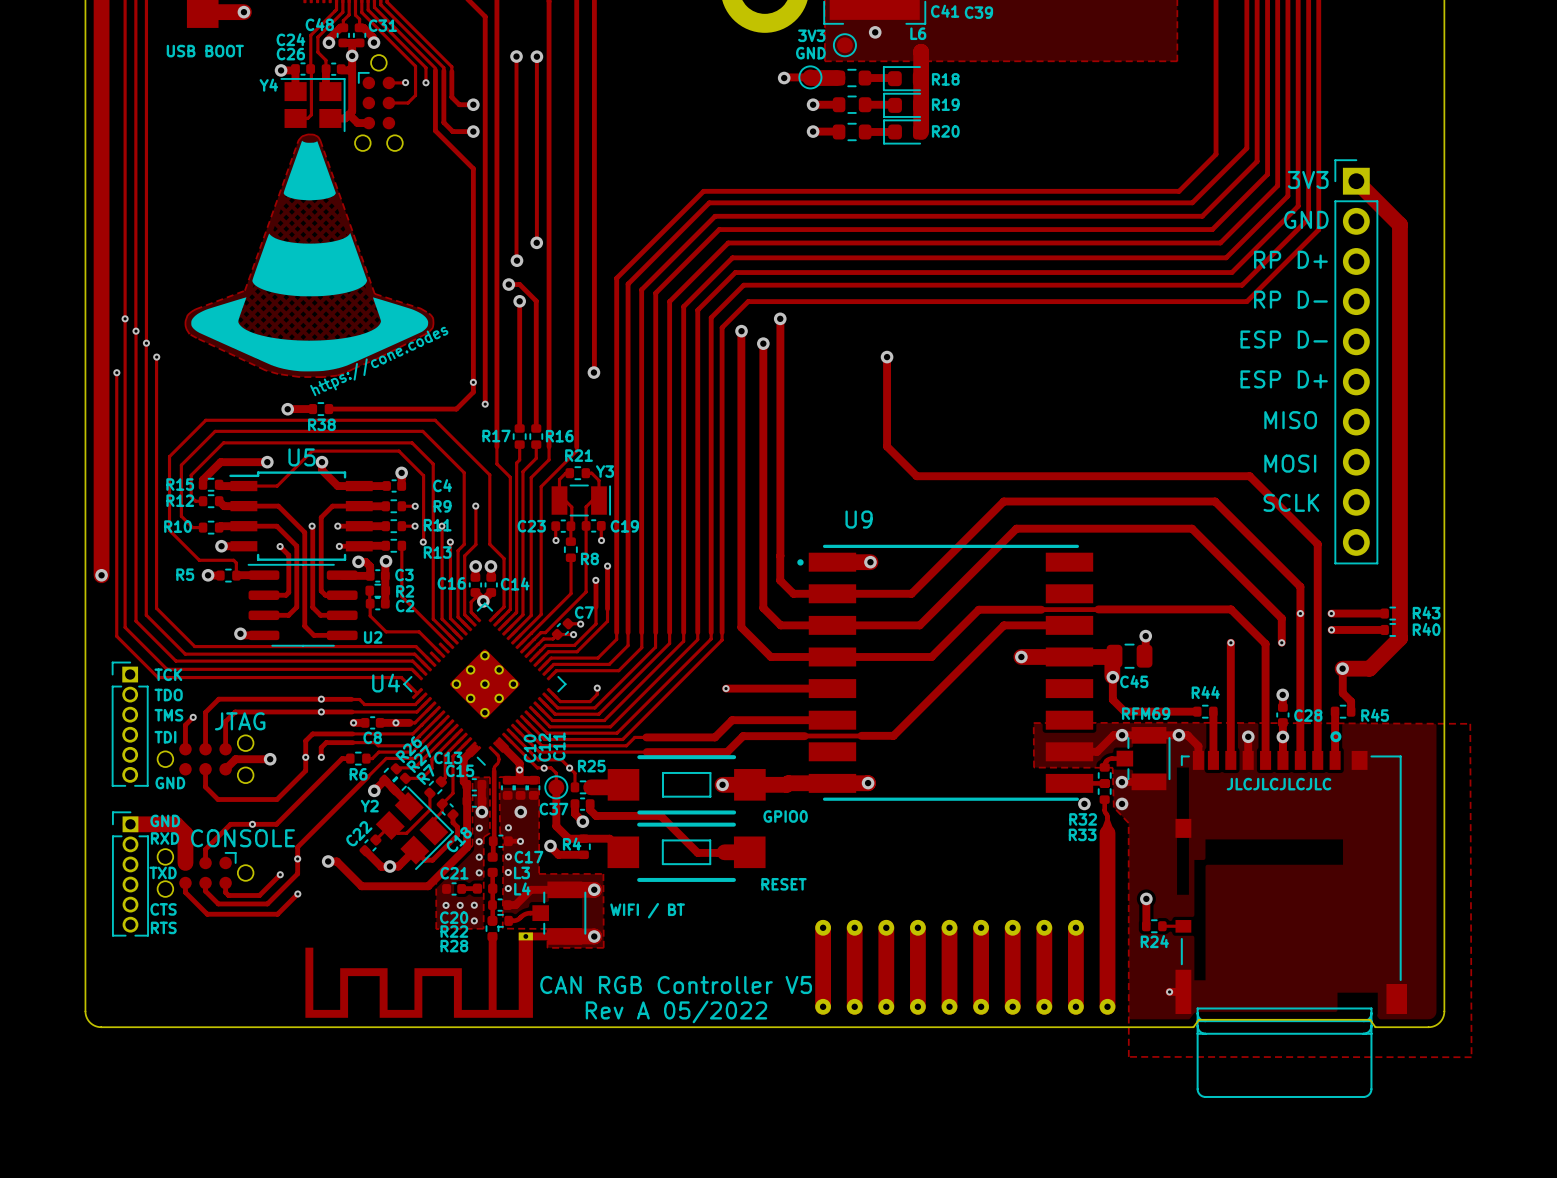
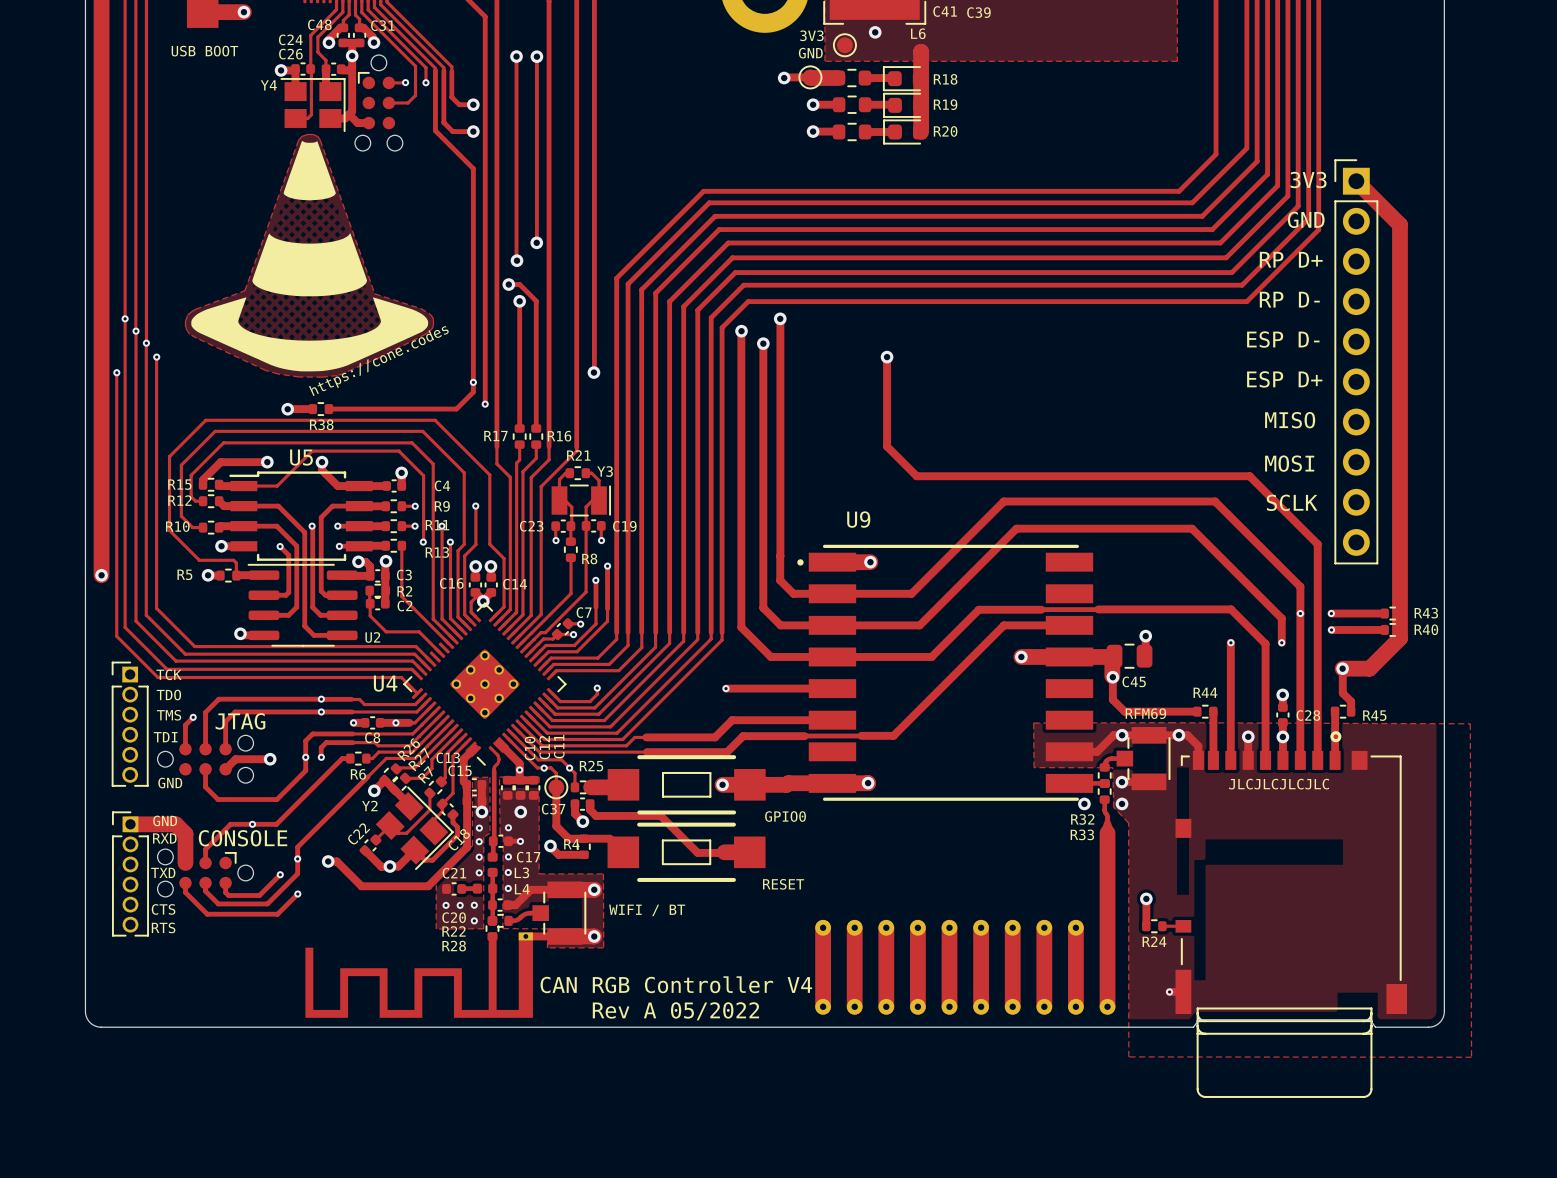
text: CAN RGB Controller V5 (676, 984) -> CAN RGB Controller V4 (676, 984)

